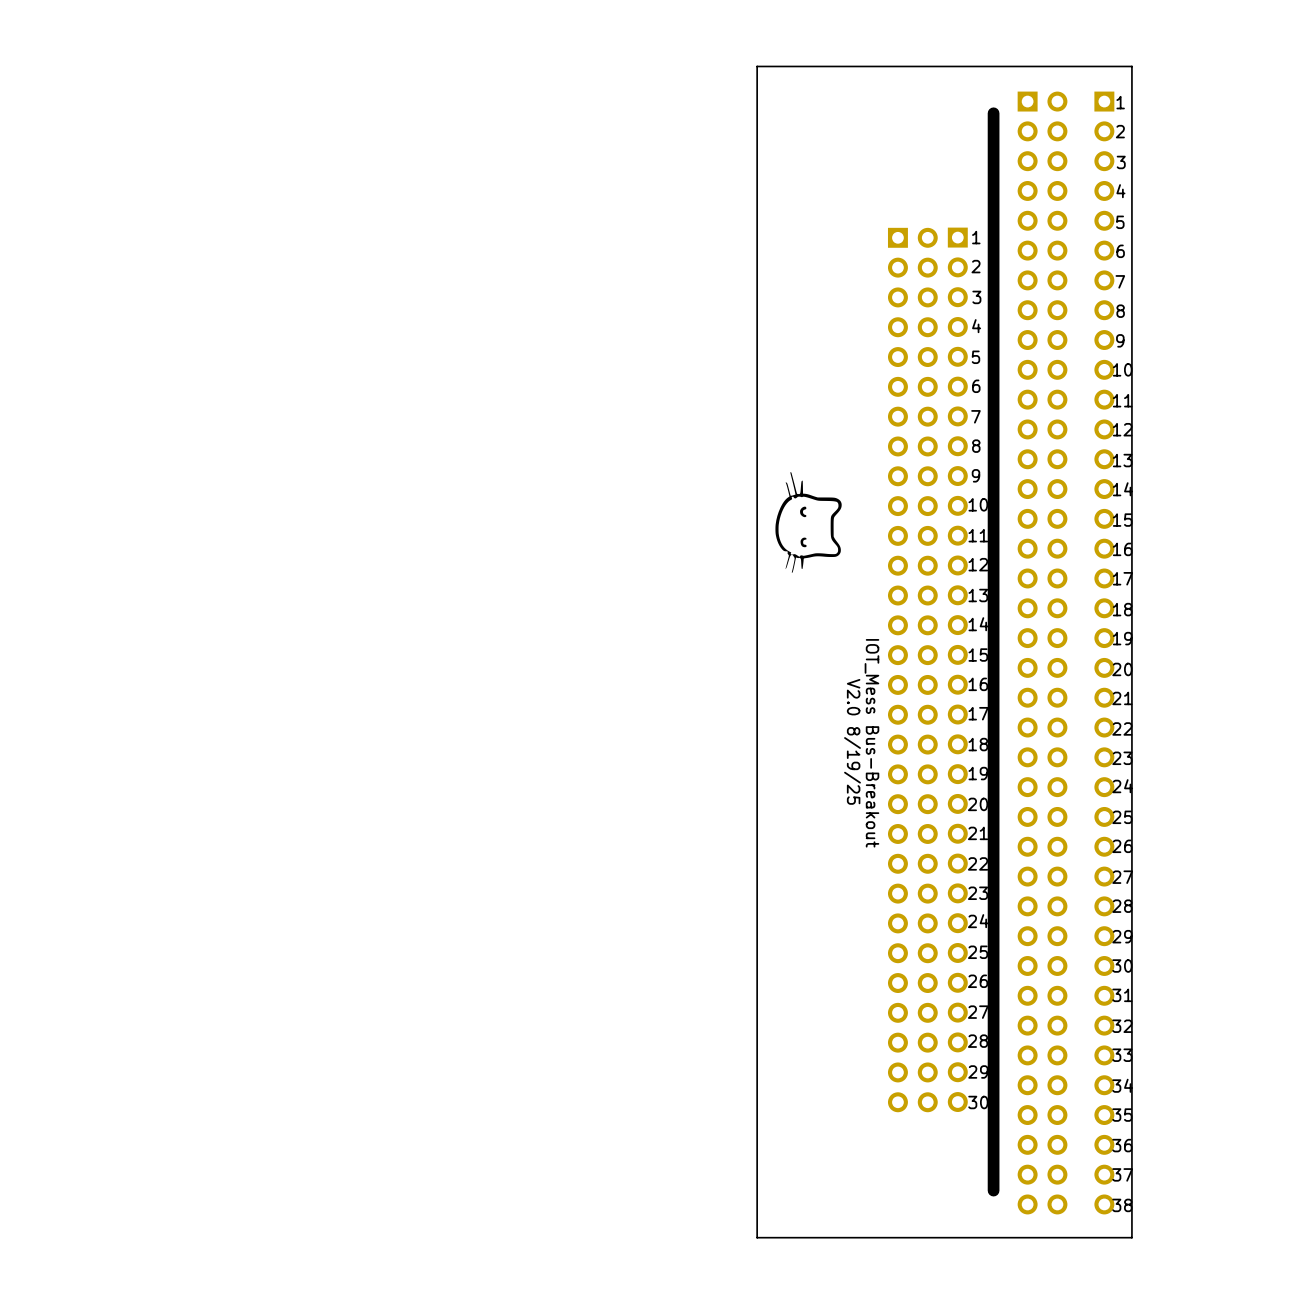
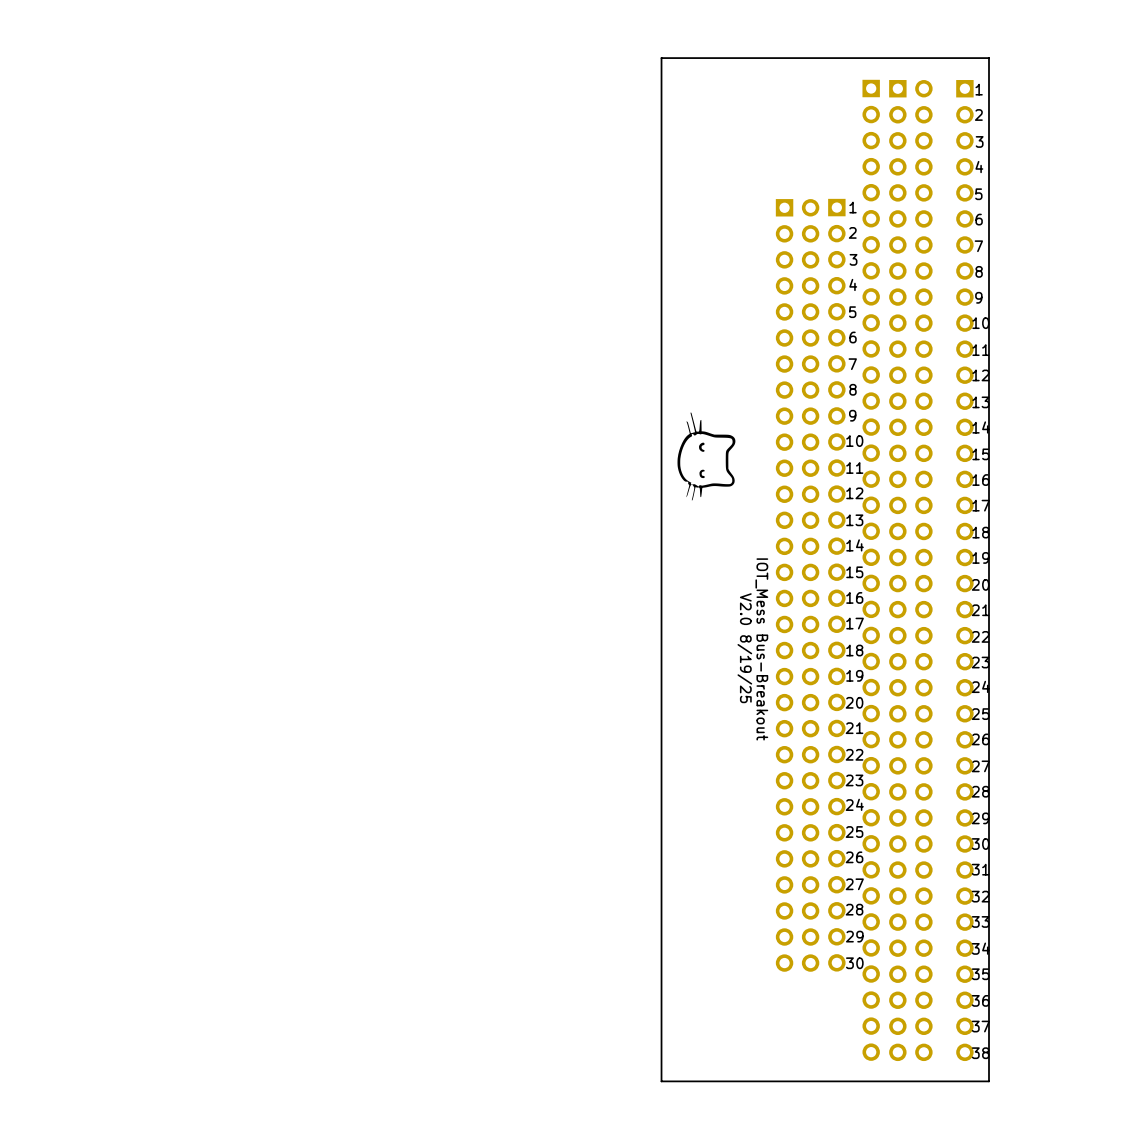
board edge: (993, 113) (993, 1190) -> none
part: none -> (871, 570)

